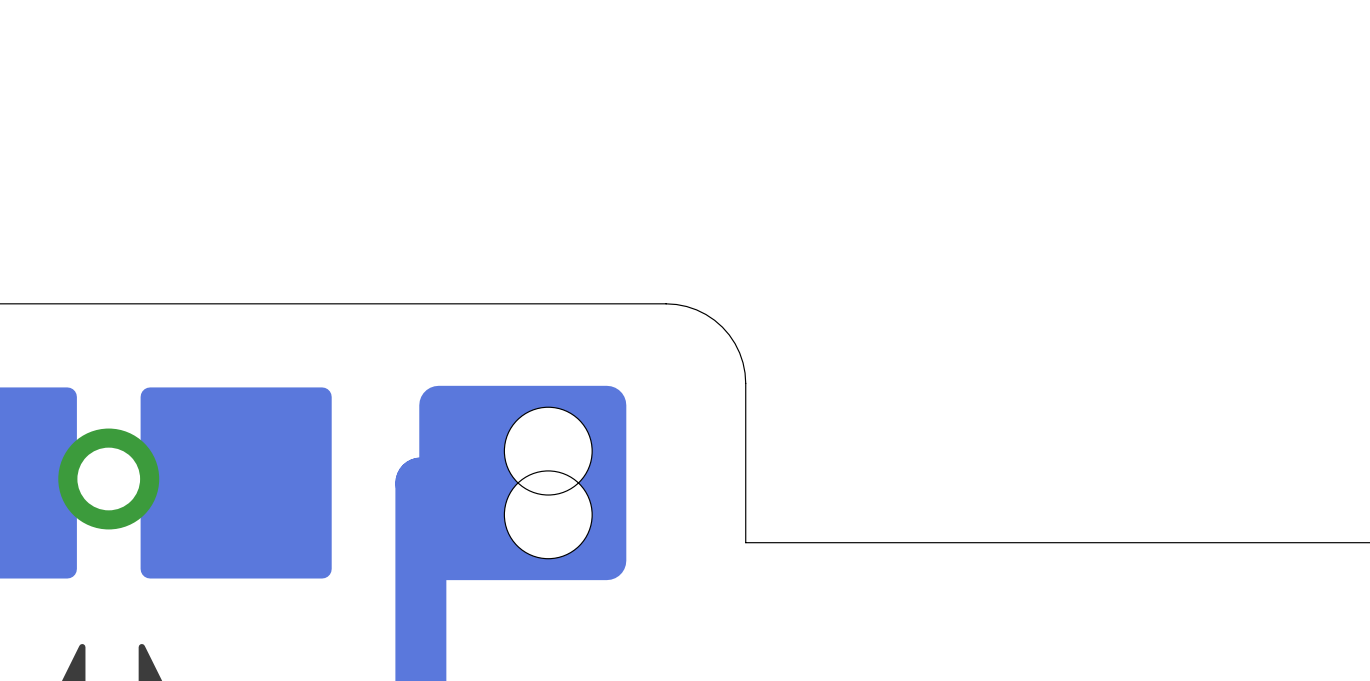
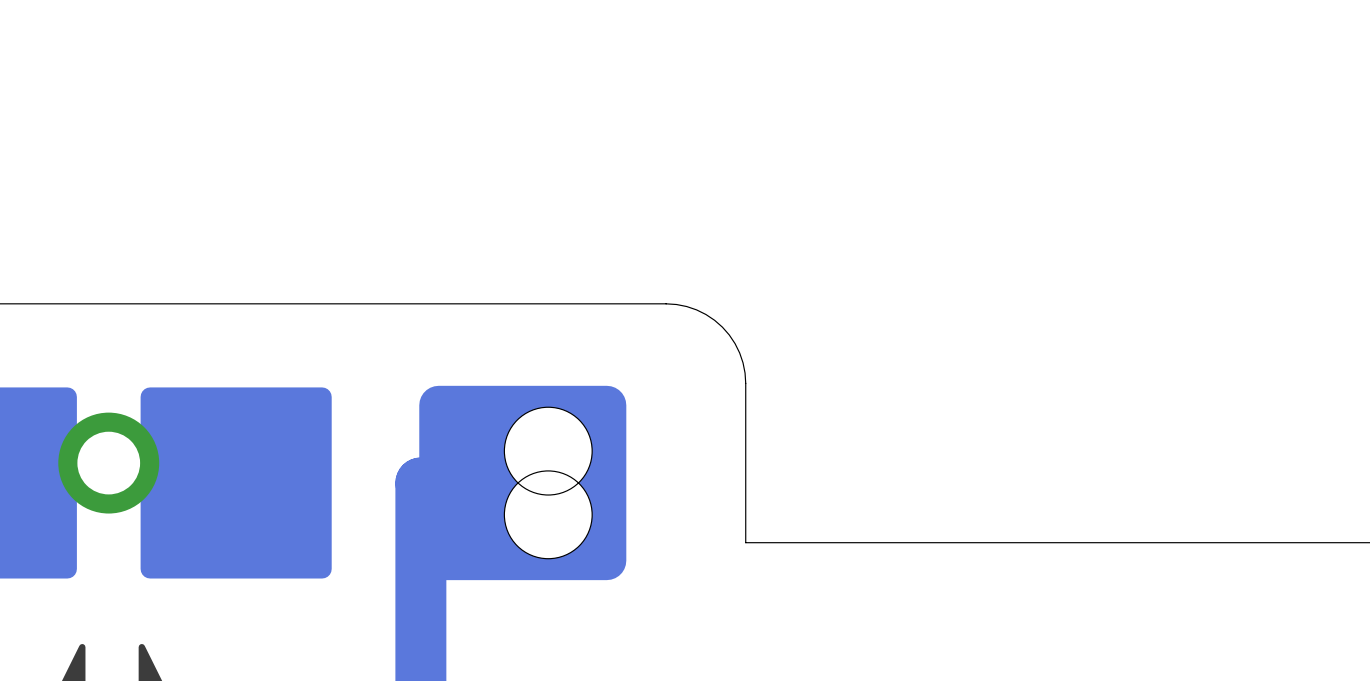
via position: (108, 479) -> (108, 463)

